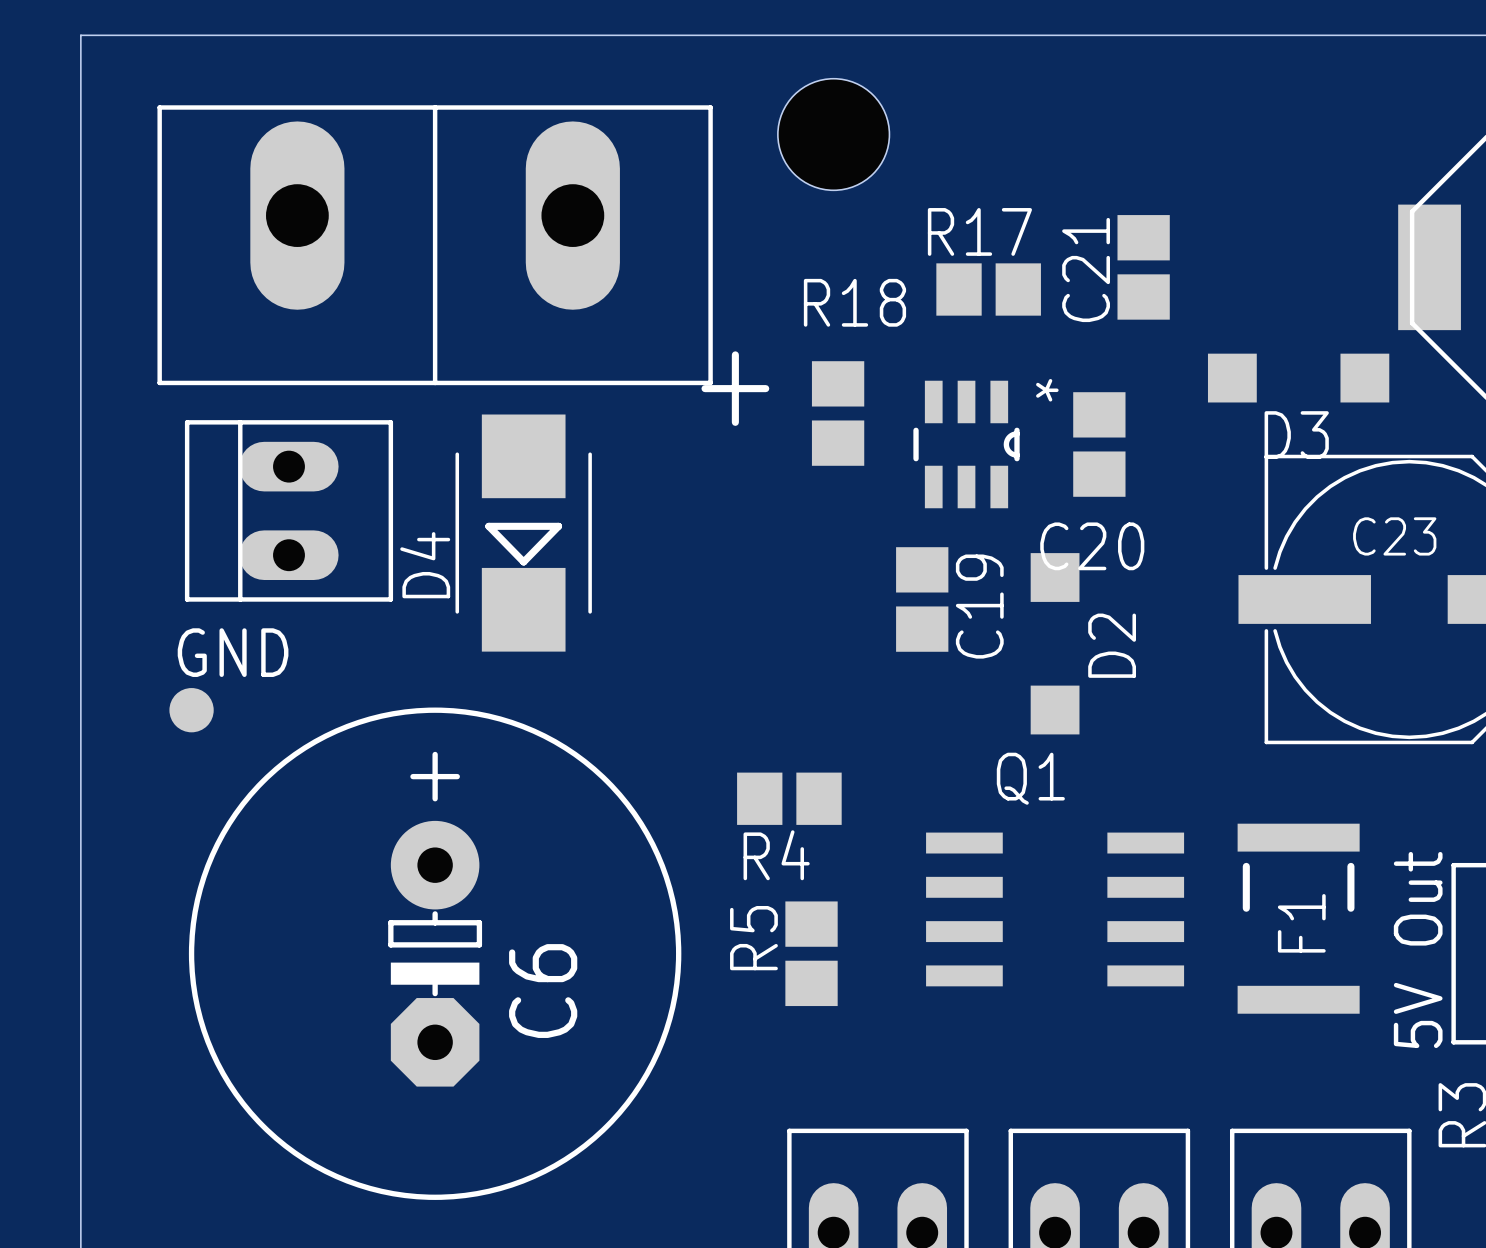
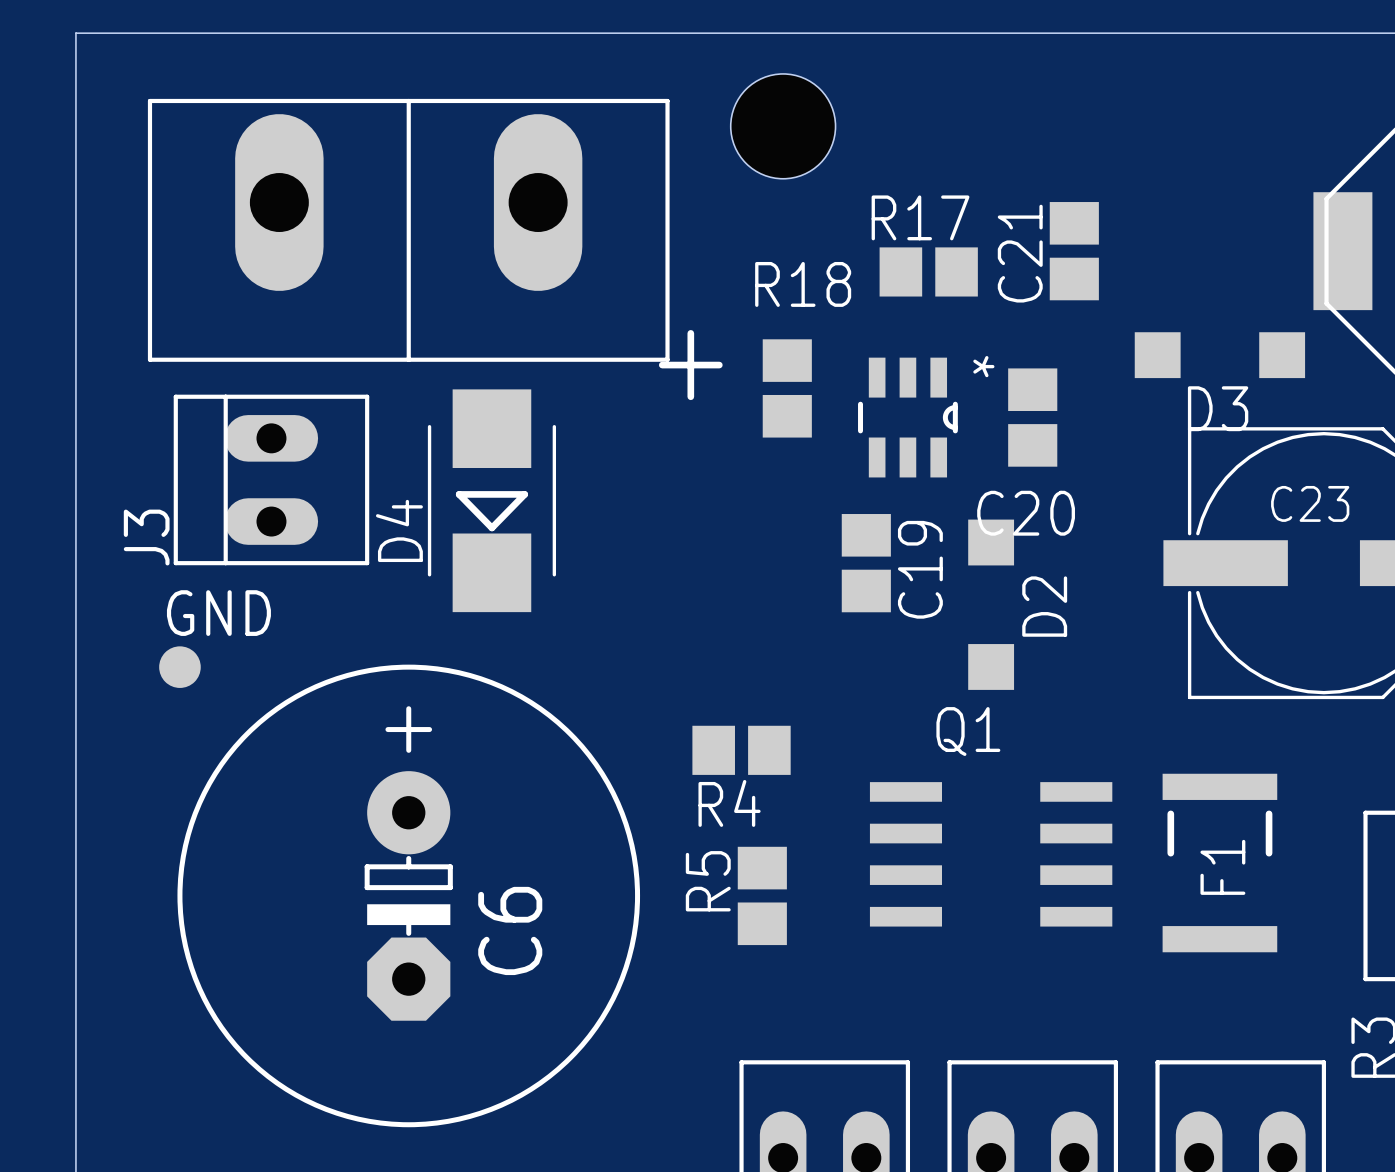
J3 name: none -> J3 (146, 537)
part value: 5V Out (1418, 950) -> none

